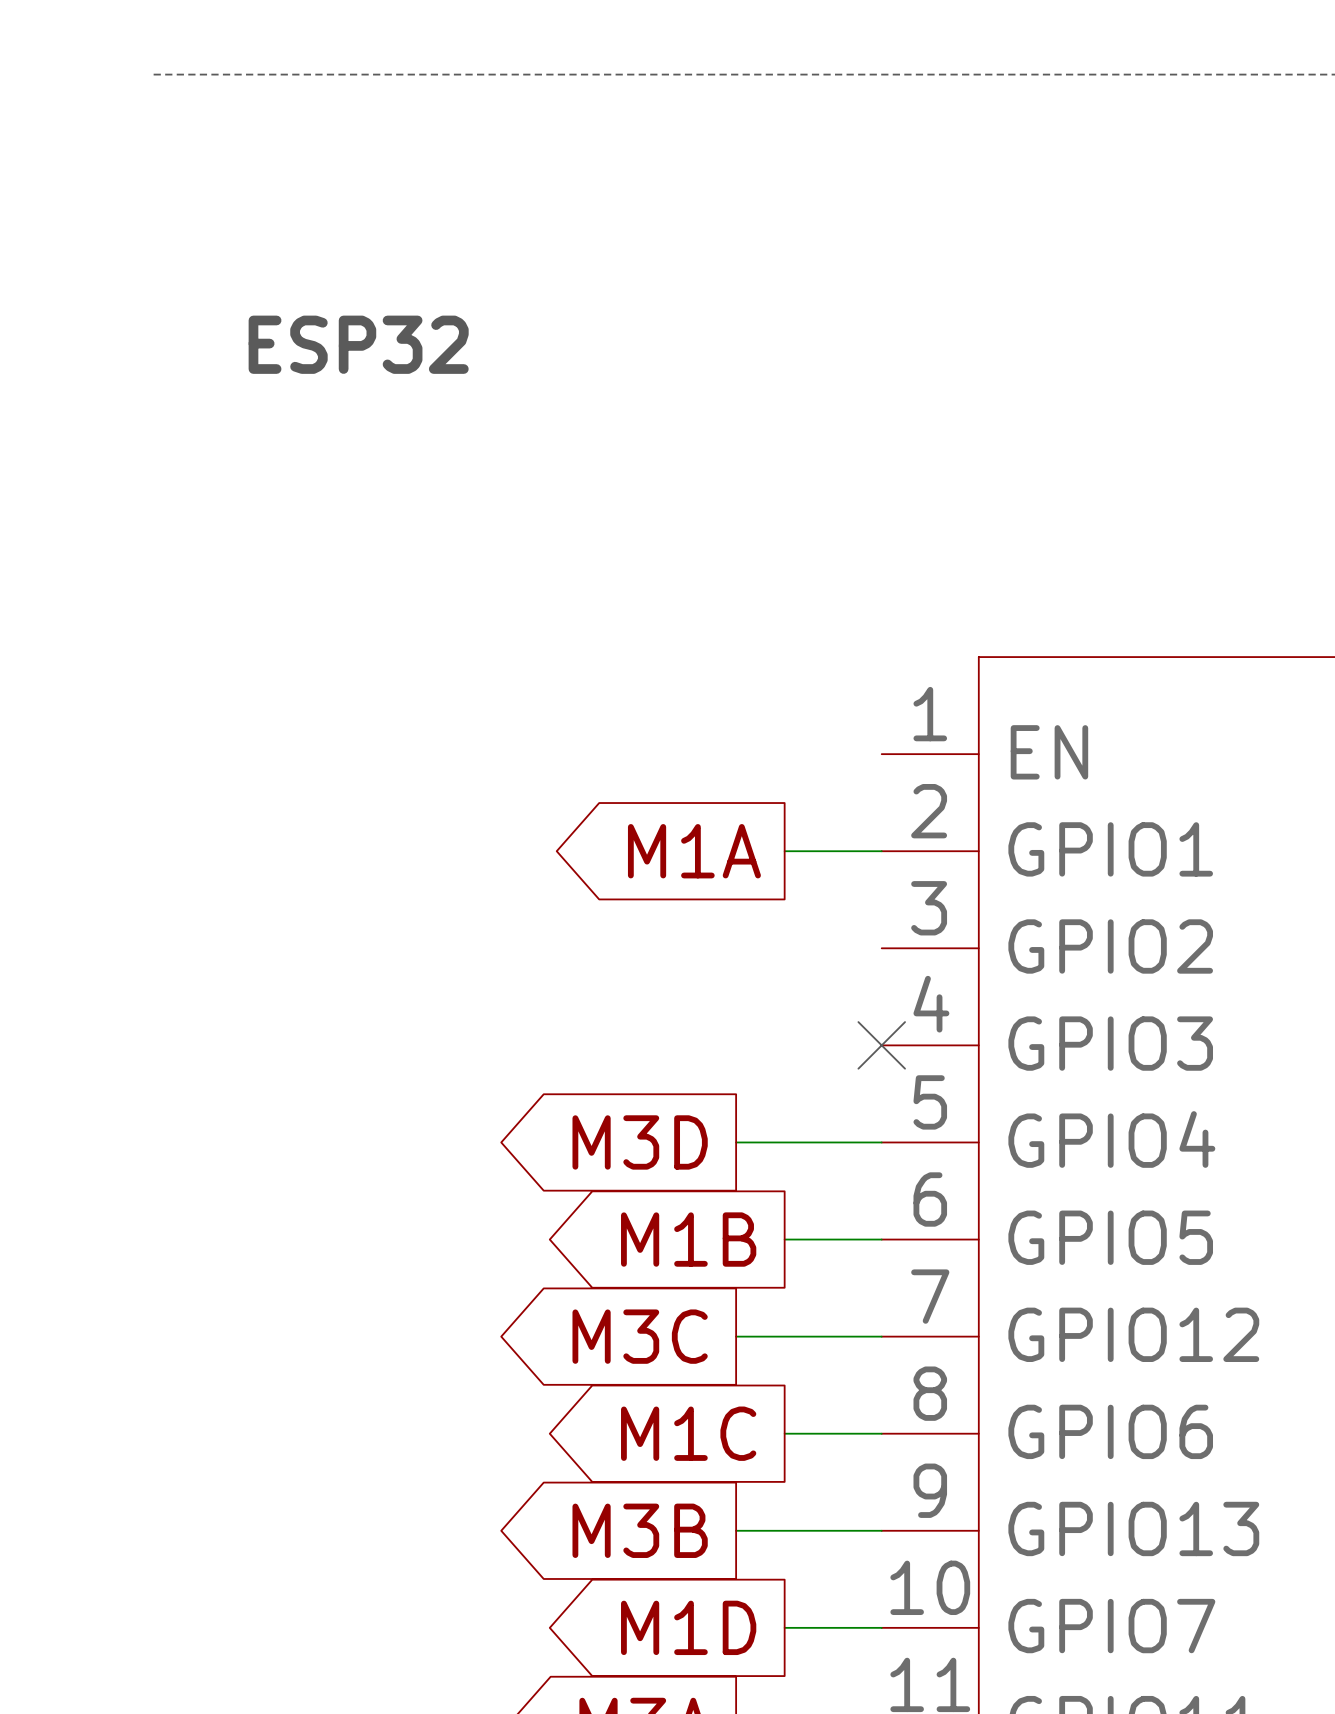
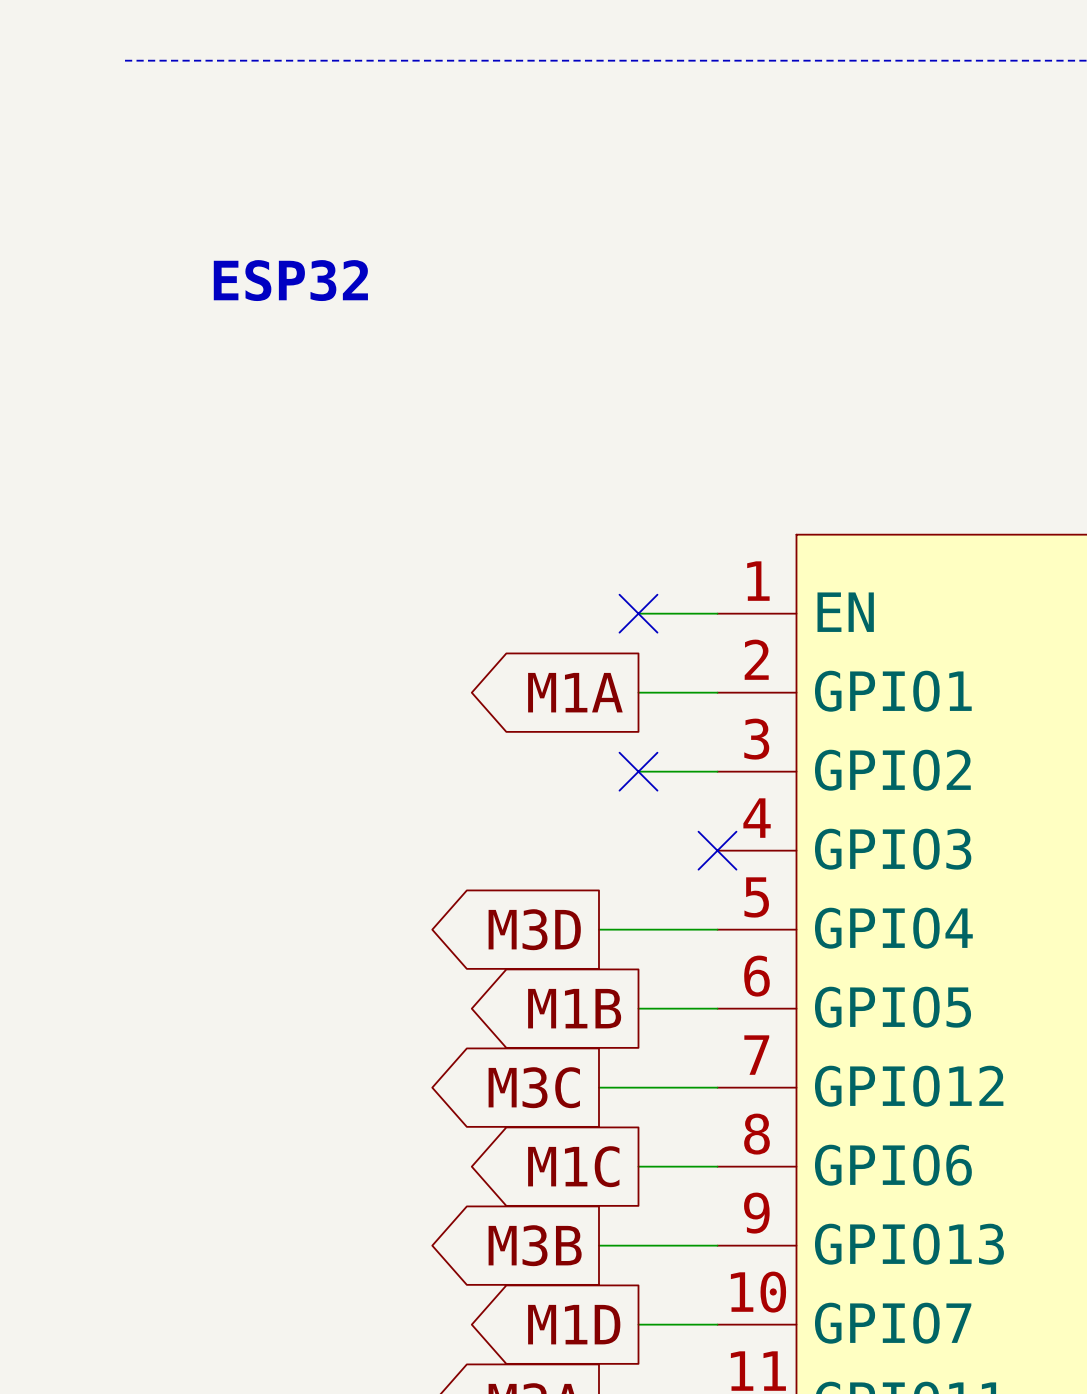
wire: none -> (638, 613) (717, 613)
no-connect mark: none -> (638, 613)
wire: none -> (638, 771) (717, 771)
no-connect mark: none -> (638, 771)

